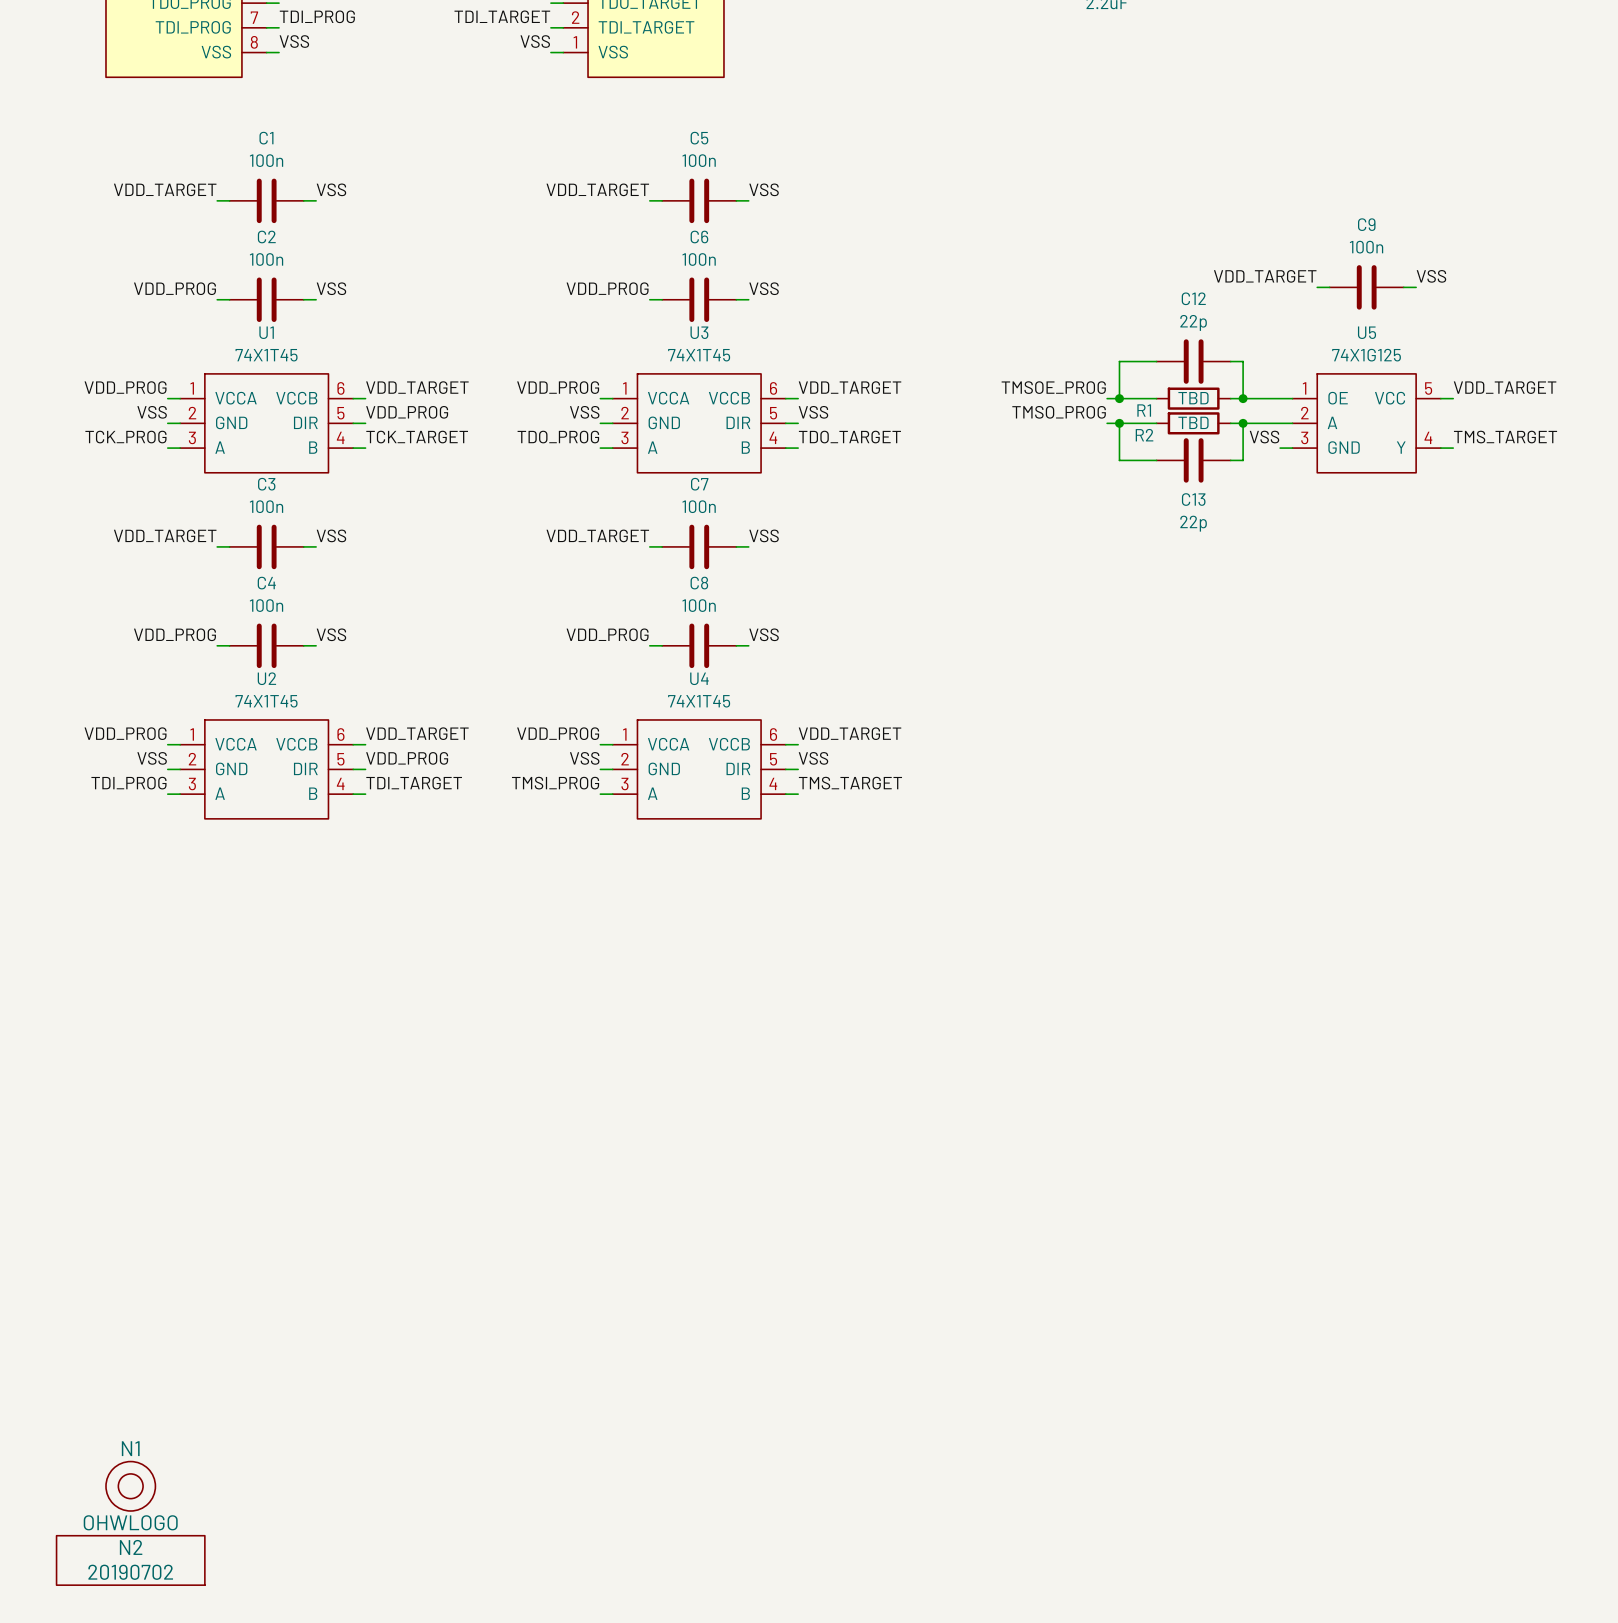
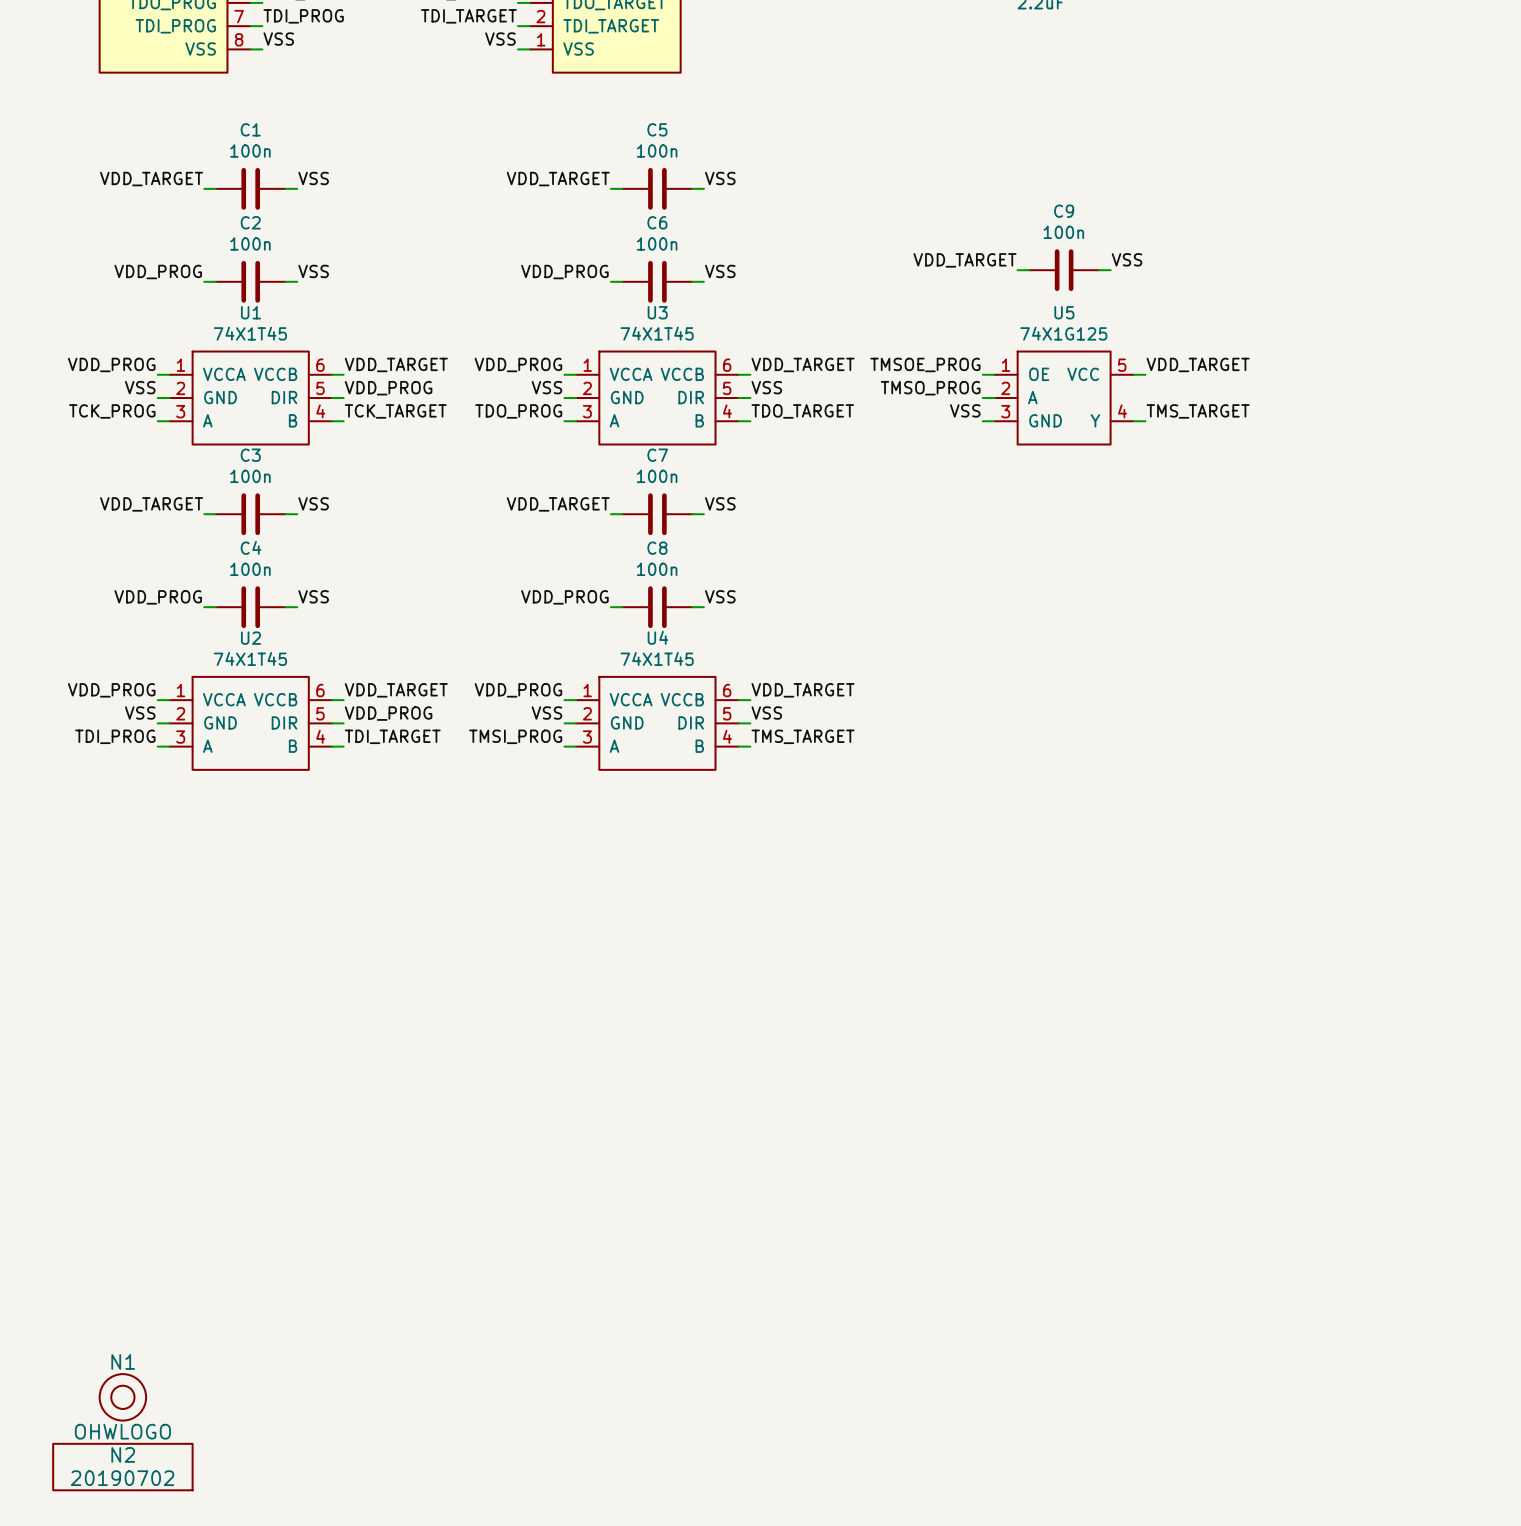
label: none -> VDD_TARGET (964, 260)
label: none -> VSS (1127, 259)
label: VDD_TARGET (1265, 276) -> none
label: VSS (1431, 276) -> none
wire: (1317, 287) (1329, 287) -> (1017, 270) (1029, 270)
C9 position: (1366, 287) -> (1064, 270)
wire: (1403, 287) (1416, 287) -> (1098, 270) (1110, 270)
wire: (1156, 361) (1119, 361) (1119, 398) -> none
C12: 22p (1193, 361) -> none
wire: (1230, 361) (1243, 361) (1243, 398) -> none
label position: TMSOE_PROG (1053, 387) -> TMSOE_PROG (925, 364)
label: none -> VDD_TARGET (1198, 364)
label: VDD_TARGET (1505, 387) -> none
wire: none -> (982, 374) (994, 374)
wire: (1107, 398) (1156, 398) -> none
junction: (1119, 398) -> none
R1: TBD (1193, 398) -> none
wire: (1230, 398) (1292, 398) -> none
junction: (1243, 398) -> none
wire: (1440, 398) (1453, 398) -> (1133, 374) (1145, 374)
label position: TMSO_PROG (1059, 412) -> TMSO_PROG (930, 388)
wire: none -> (982, 398) (994, 398)
wire: (1107, 423) (1156, 423) -> none
wire: (1119, 423) (1119, 460) (1156, 460) -> none
junction: (1119, 423) -> none
R2: TBD (1193, 423) -> none
wire: (1230, 423) (1292, 423) -> none
wire: (1243, 423) (1243, 460) (1230, 460) -> none
junction: (1243, 423) -> none
U5 position: (1366, 423) -> (1064, 398)
label: none -> VSS (965, 410)
label: VSS (1264, 437) -> none
label position: TMS_TARGET (1505, 437) -> TMS_TARGET (1198, 411)
wire: (1280, 448) (1292, 448) -> (982, 421) (994, 421)
wire: (1440, 448) (1453, 448) -> (1133, 421) (1145, 421)
C13: 22p (1193, 460) -> none

